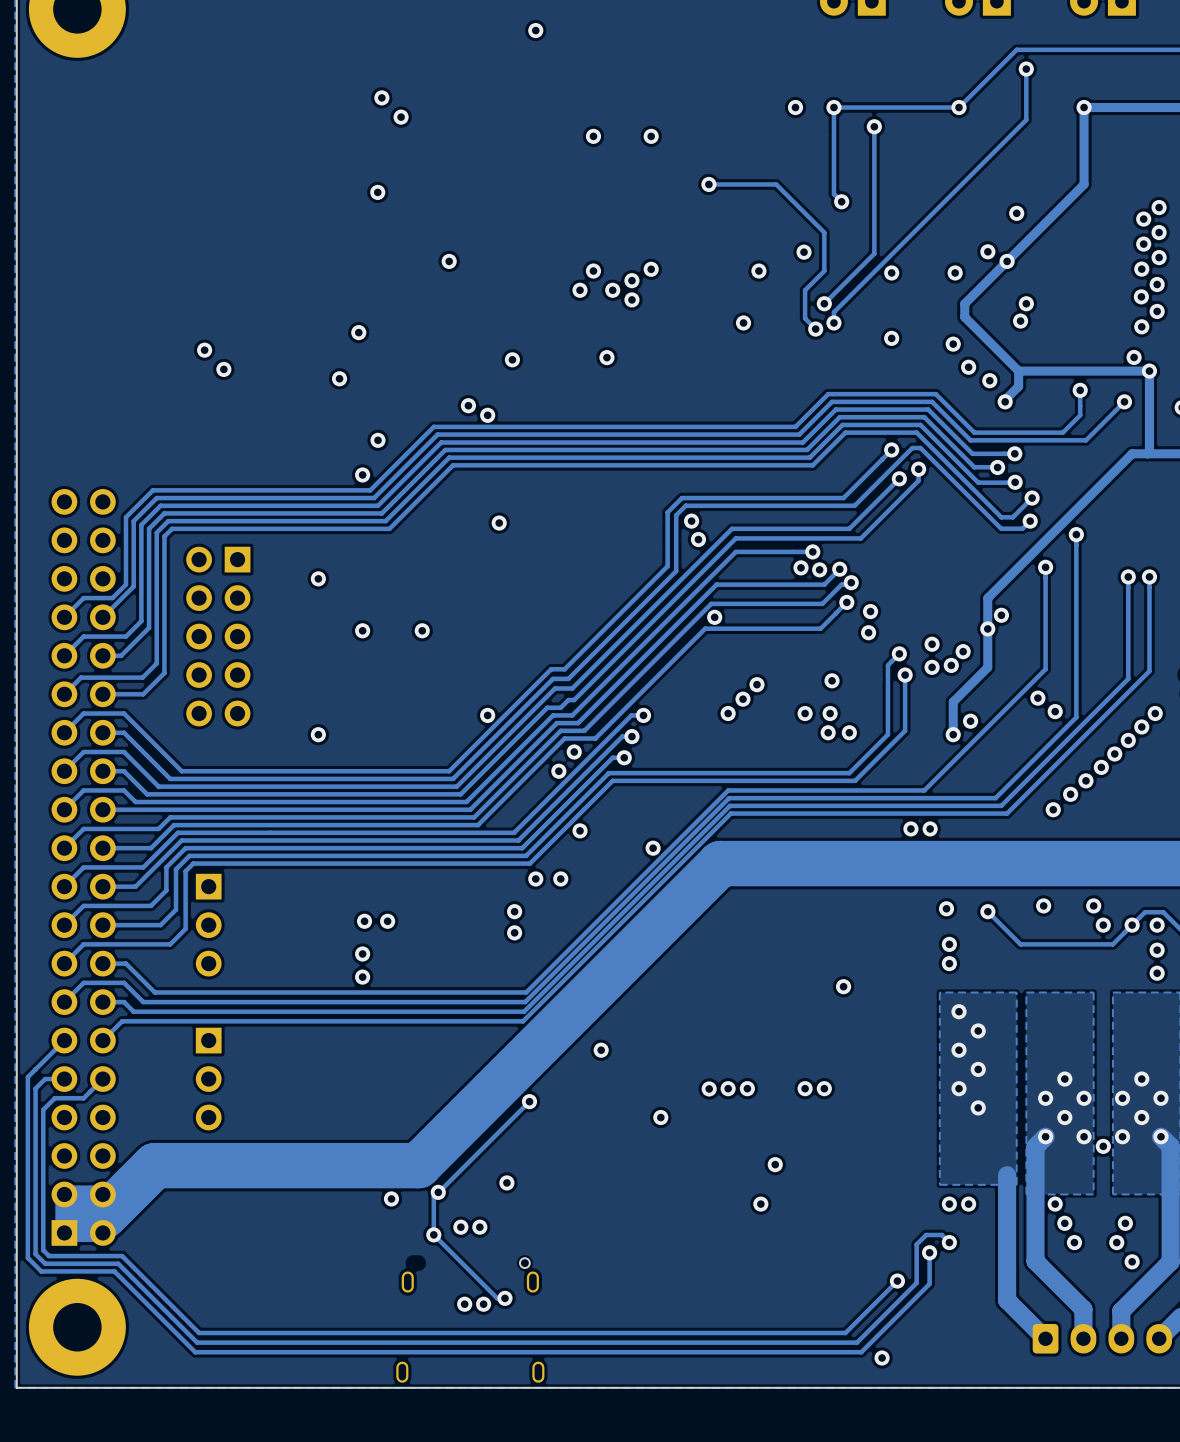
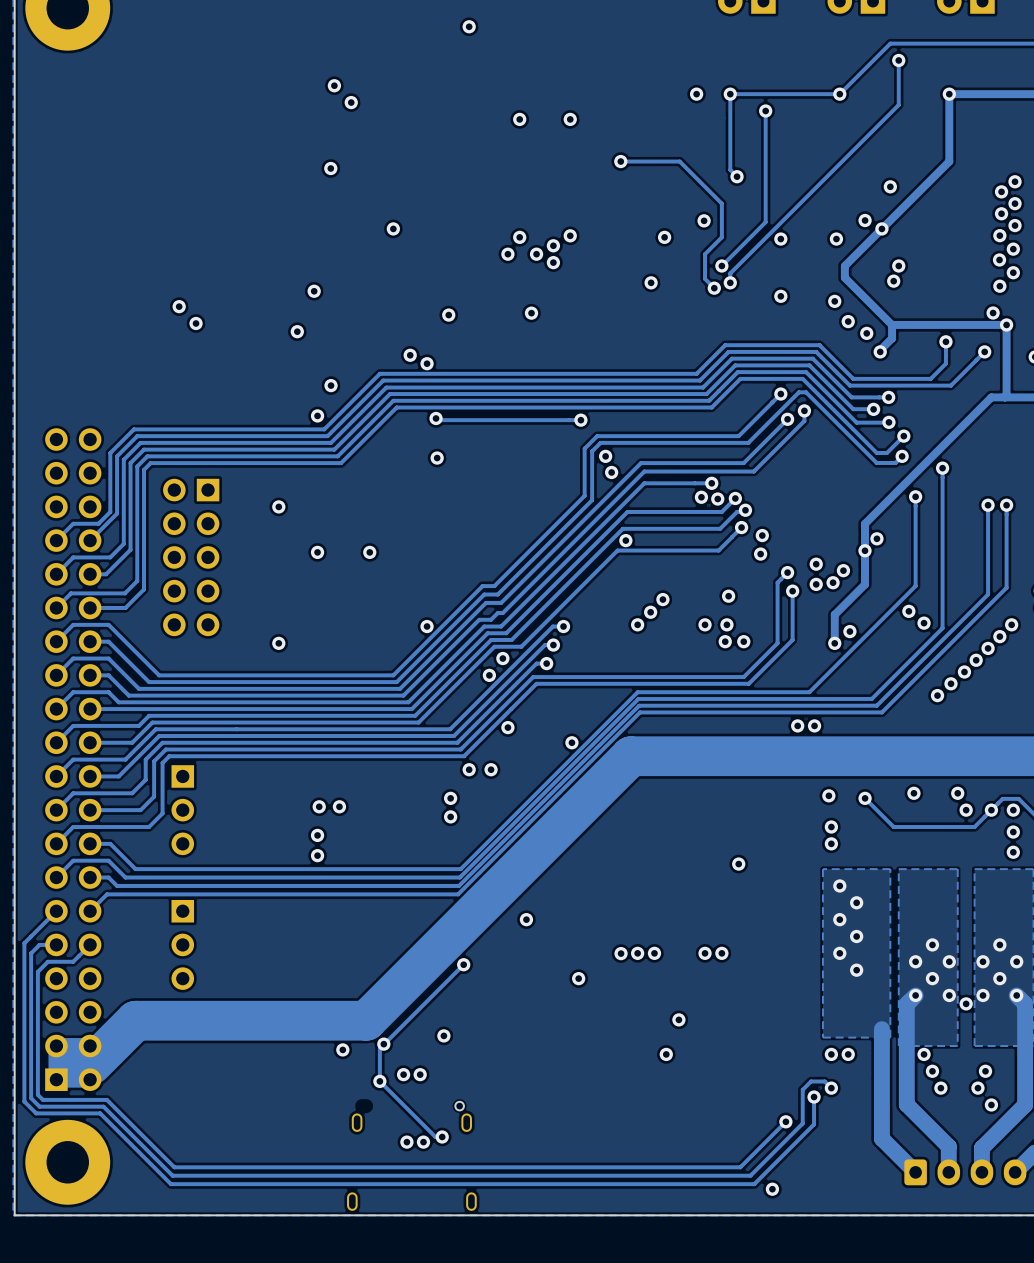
track: none -> (436, 418) (437, 420) (580, 420)
via: none -> (436, 418)
via: none -> (580, 420)
via: (1053, 809) -> none

